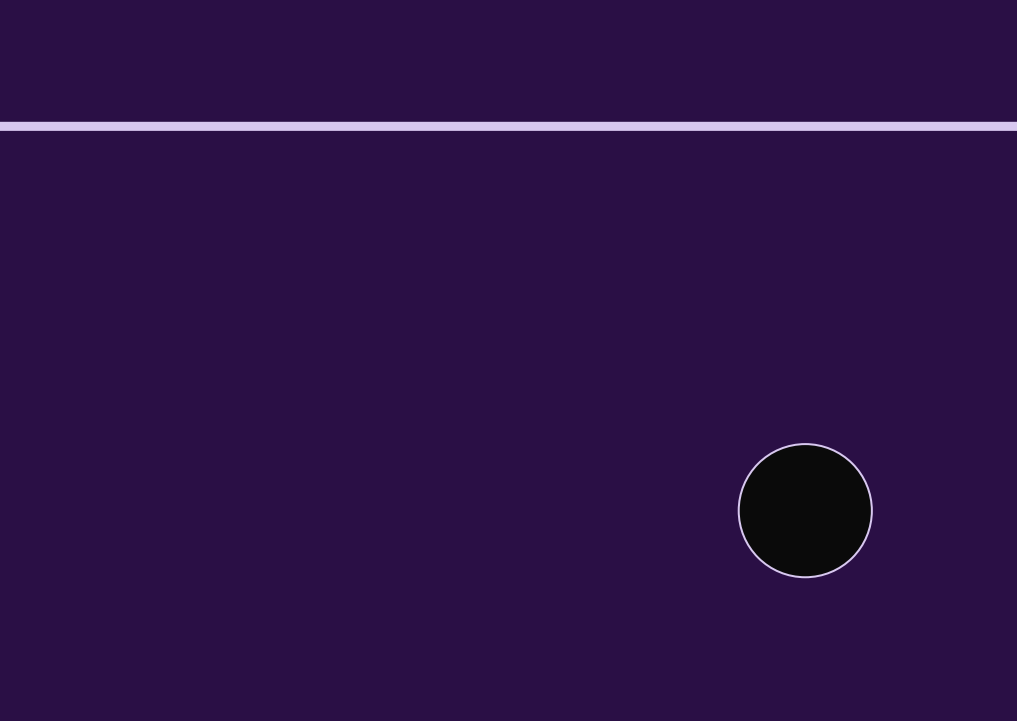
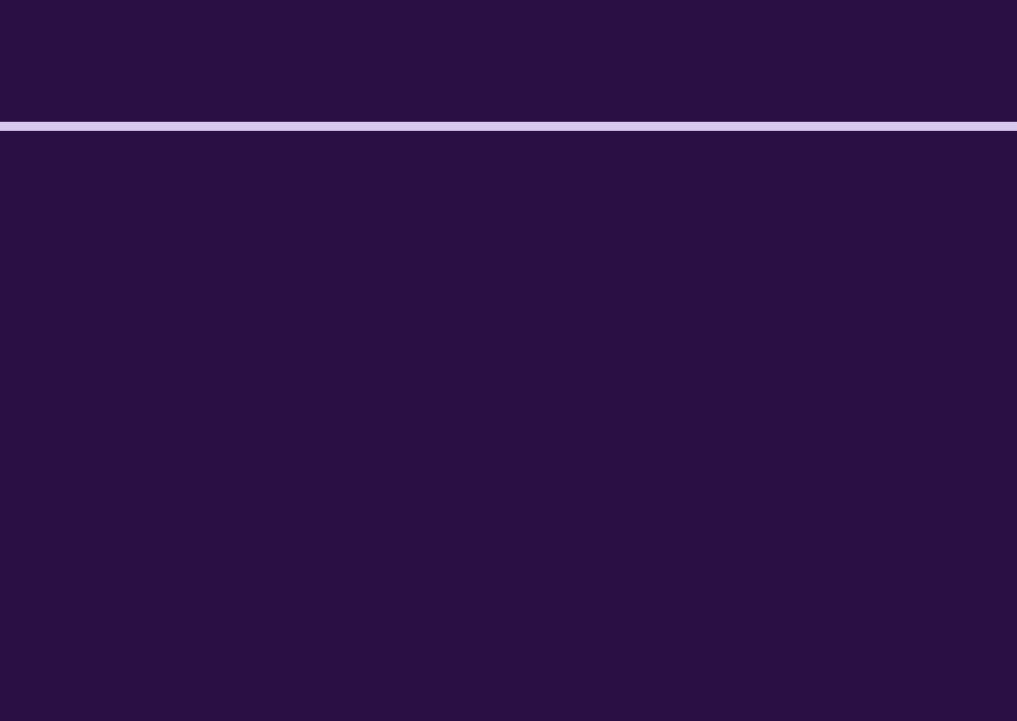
part: (805, 510) -> none

